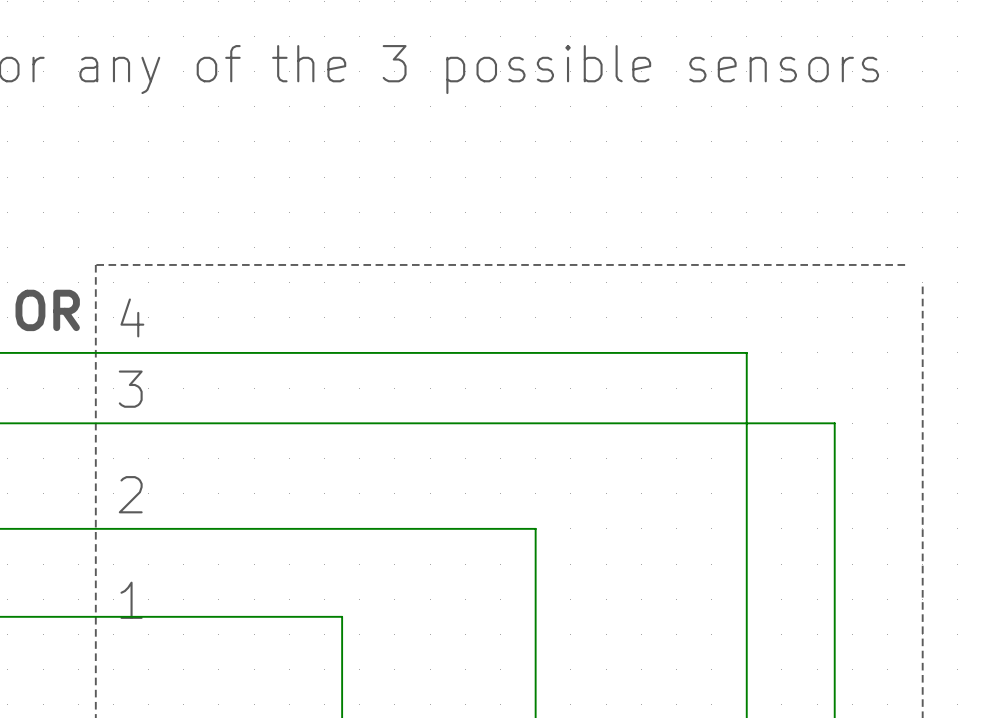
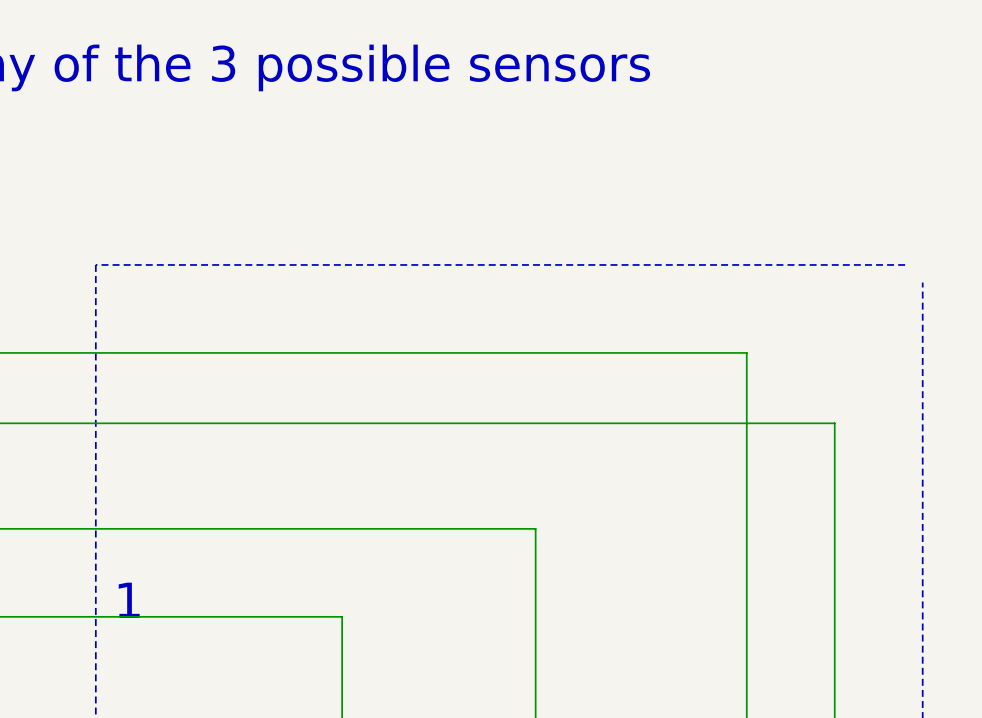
text: OR (47, 310) -> none
text: 4 (132, 317) -> none
text: 3 (130, 389) -> none
text: 2 (130, 494) -> none

